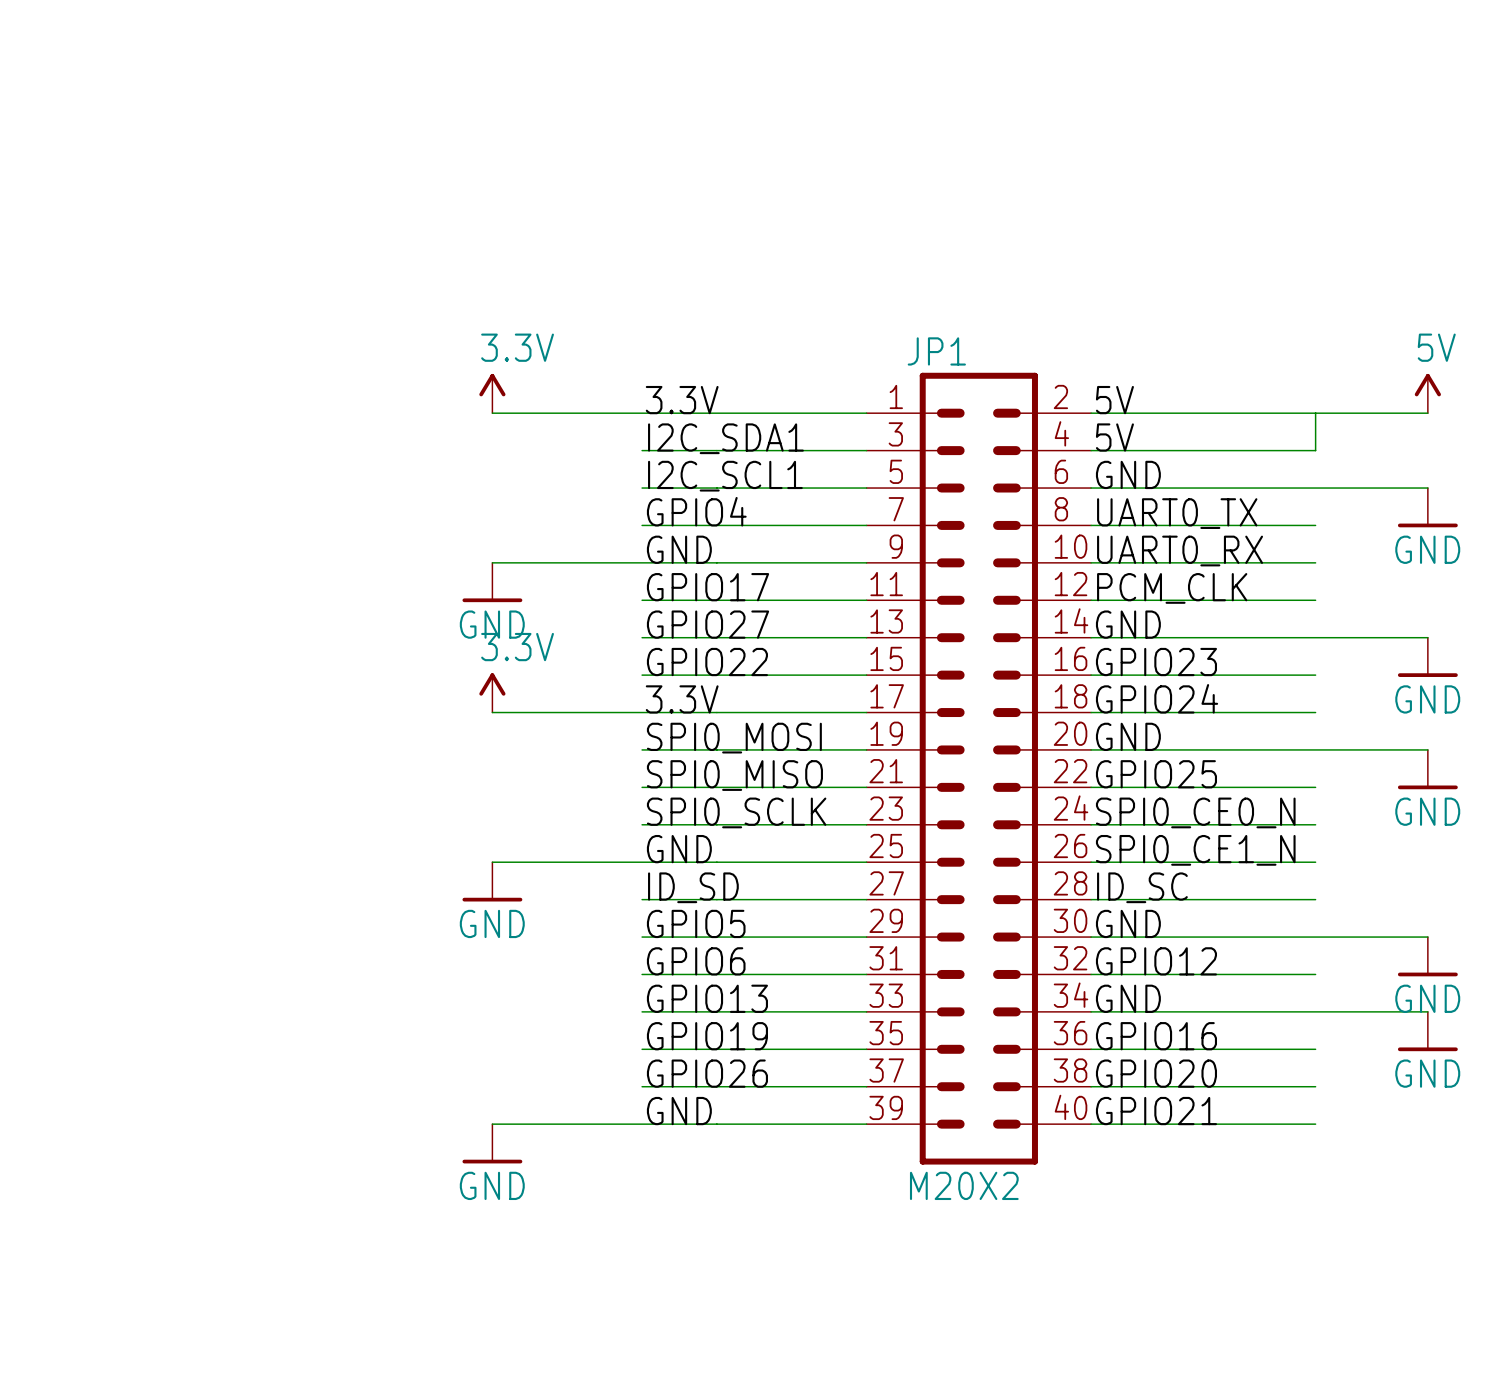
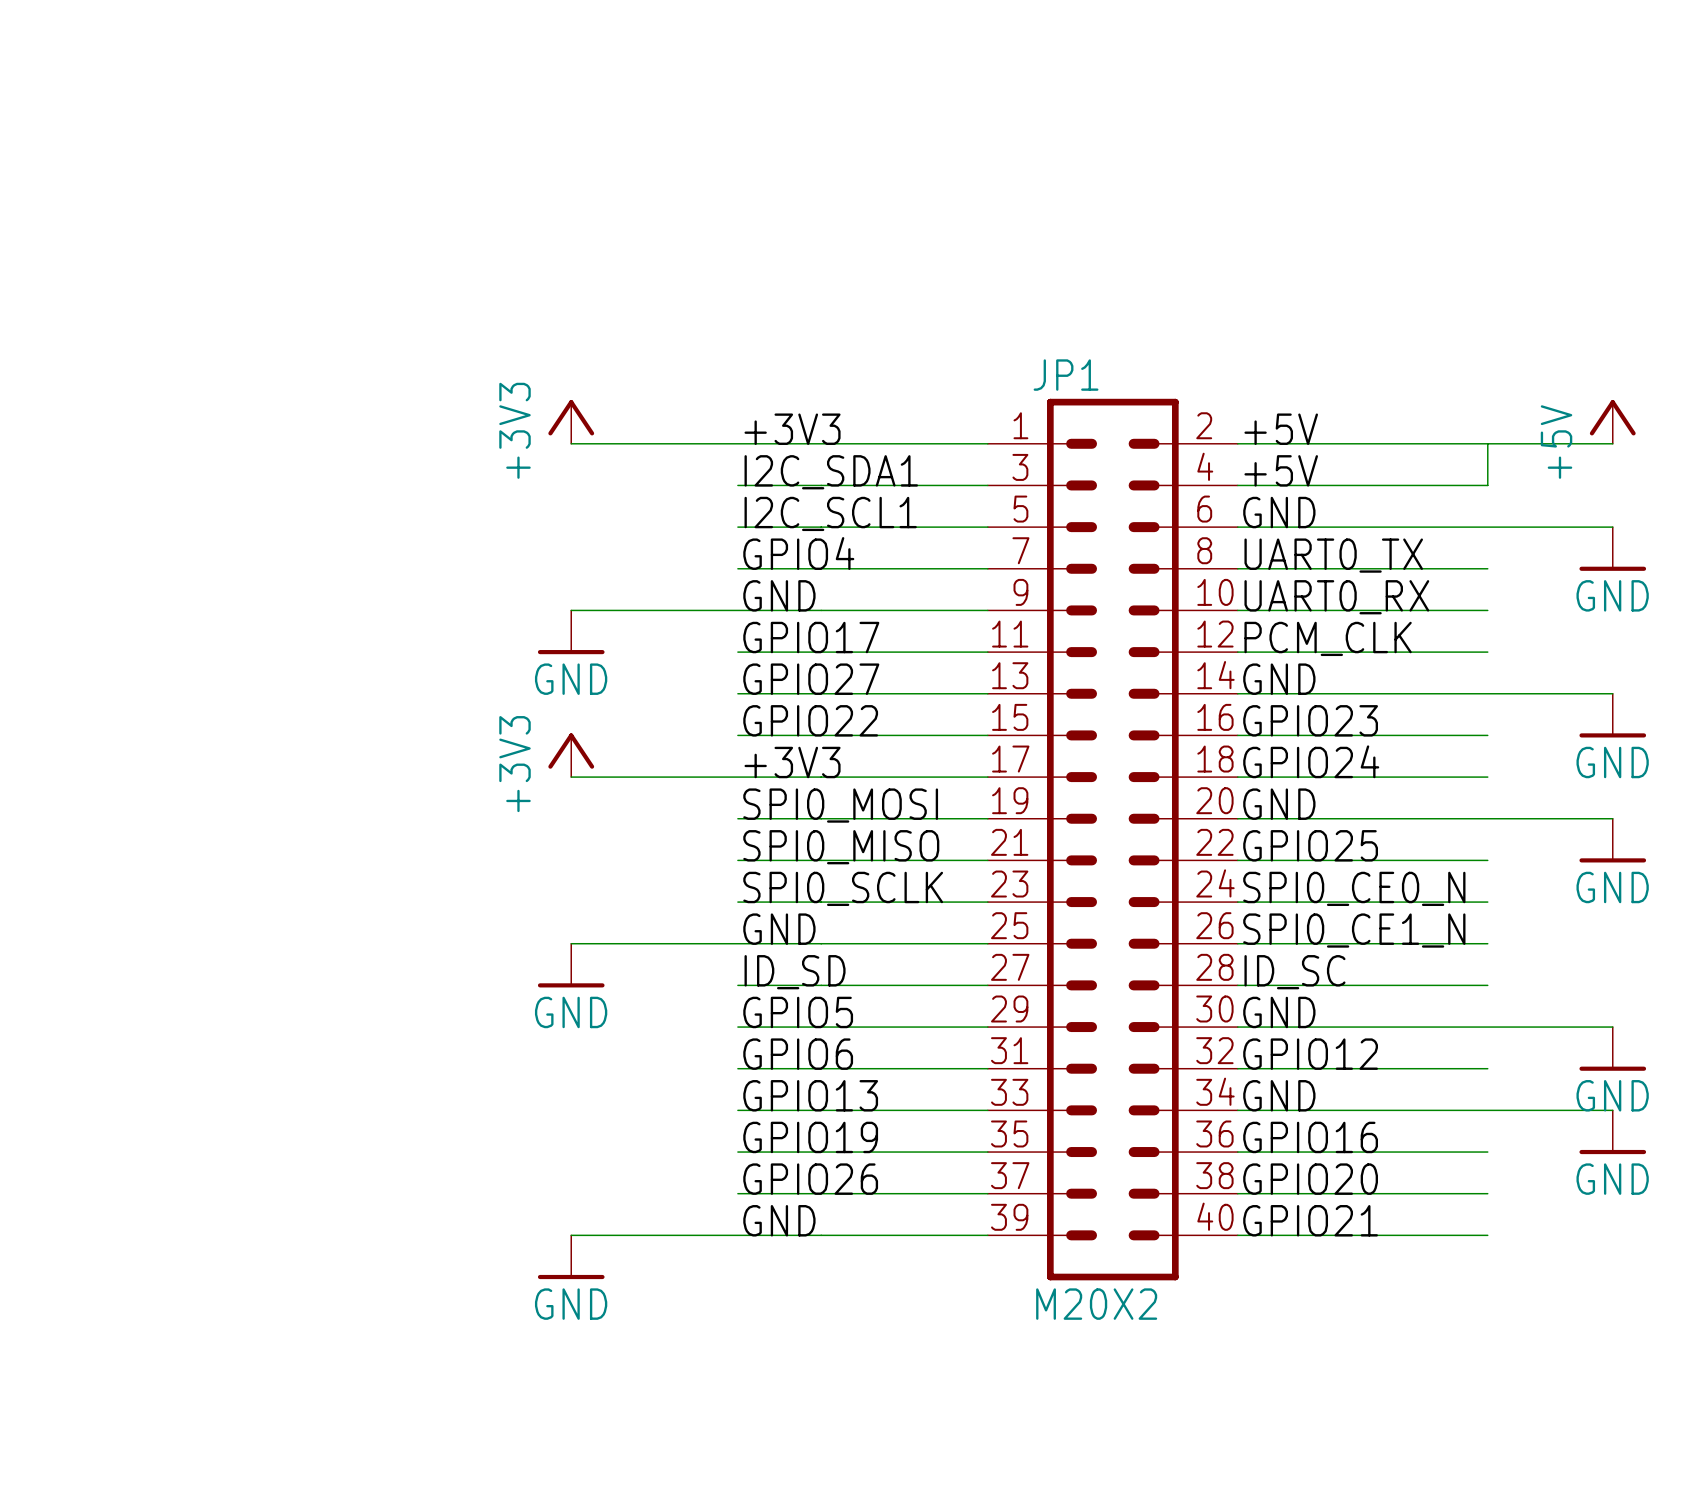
power symbol: 3.3V (492, 393) -> +3V3 (571, 421)
power symbol: 5V (1427, 393) -> +5V (1612, 421)
label: 3.3V (682, 400) -> +3V3 (792, 429)
label: 5V (1114, 400) -> +5V (1281, 429)
label: 5V (1114, 437) -> +5V (1281, 470)
power symbol: 3.3V (492, 692) -> +3V3 (571, 755)
label: 3.3V (682, 699) -> +3V3 (792, 762)

